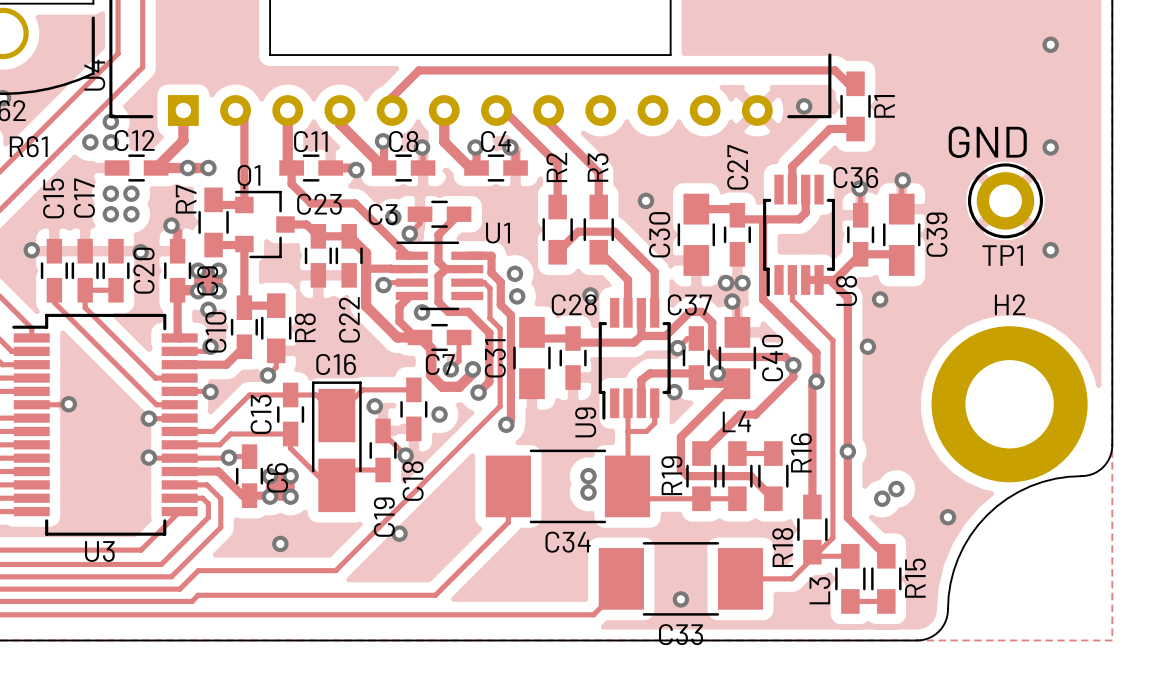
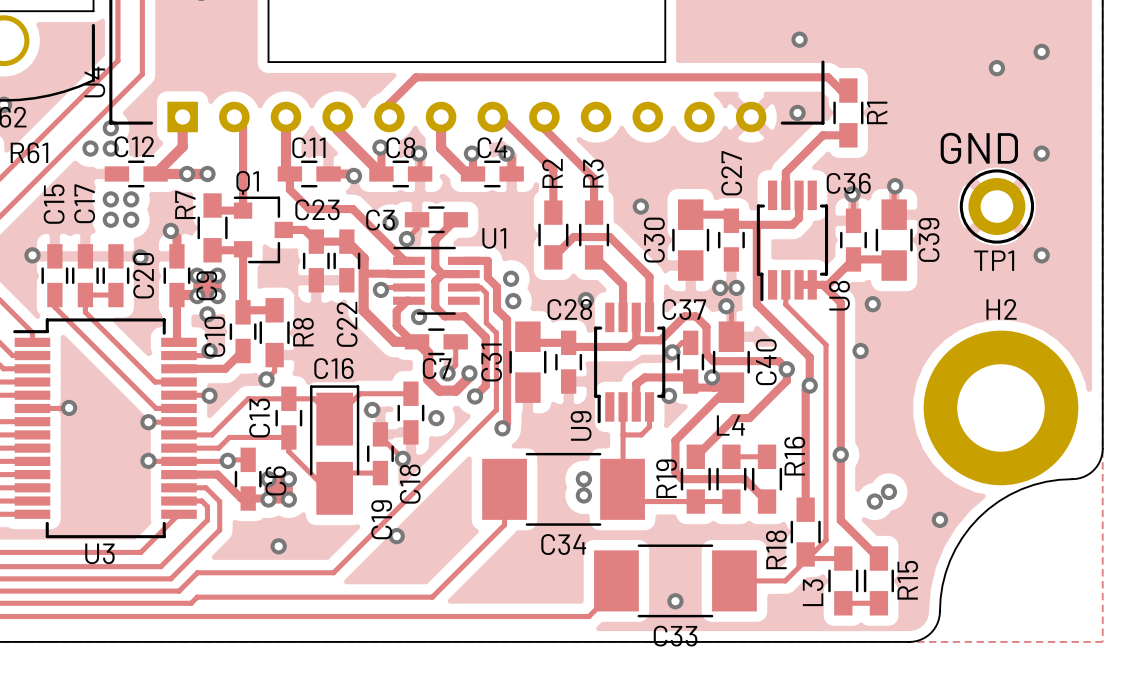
via: none -> (799, 39)
via: none -> (996, 68)

